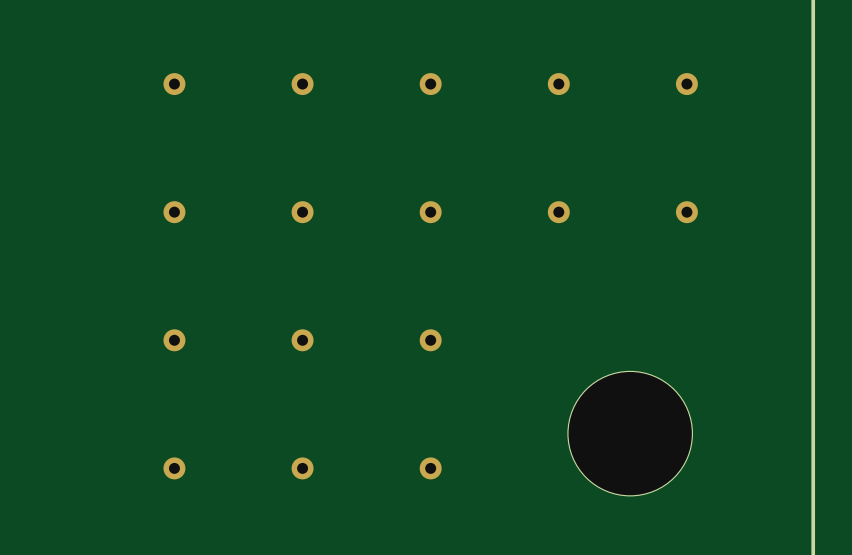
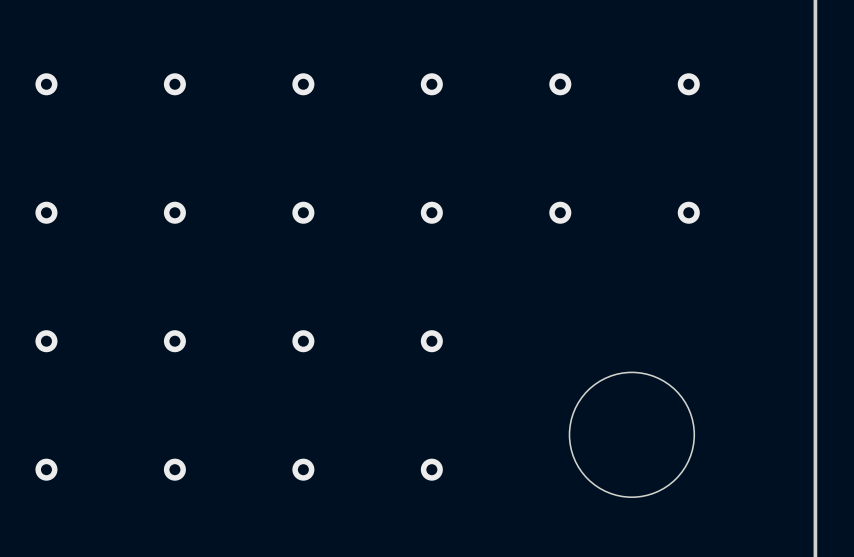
via: none -> (46, 84)
via: none -> (46, 212)
via: none -> (46, 341)
via: none -> (46, 469)

